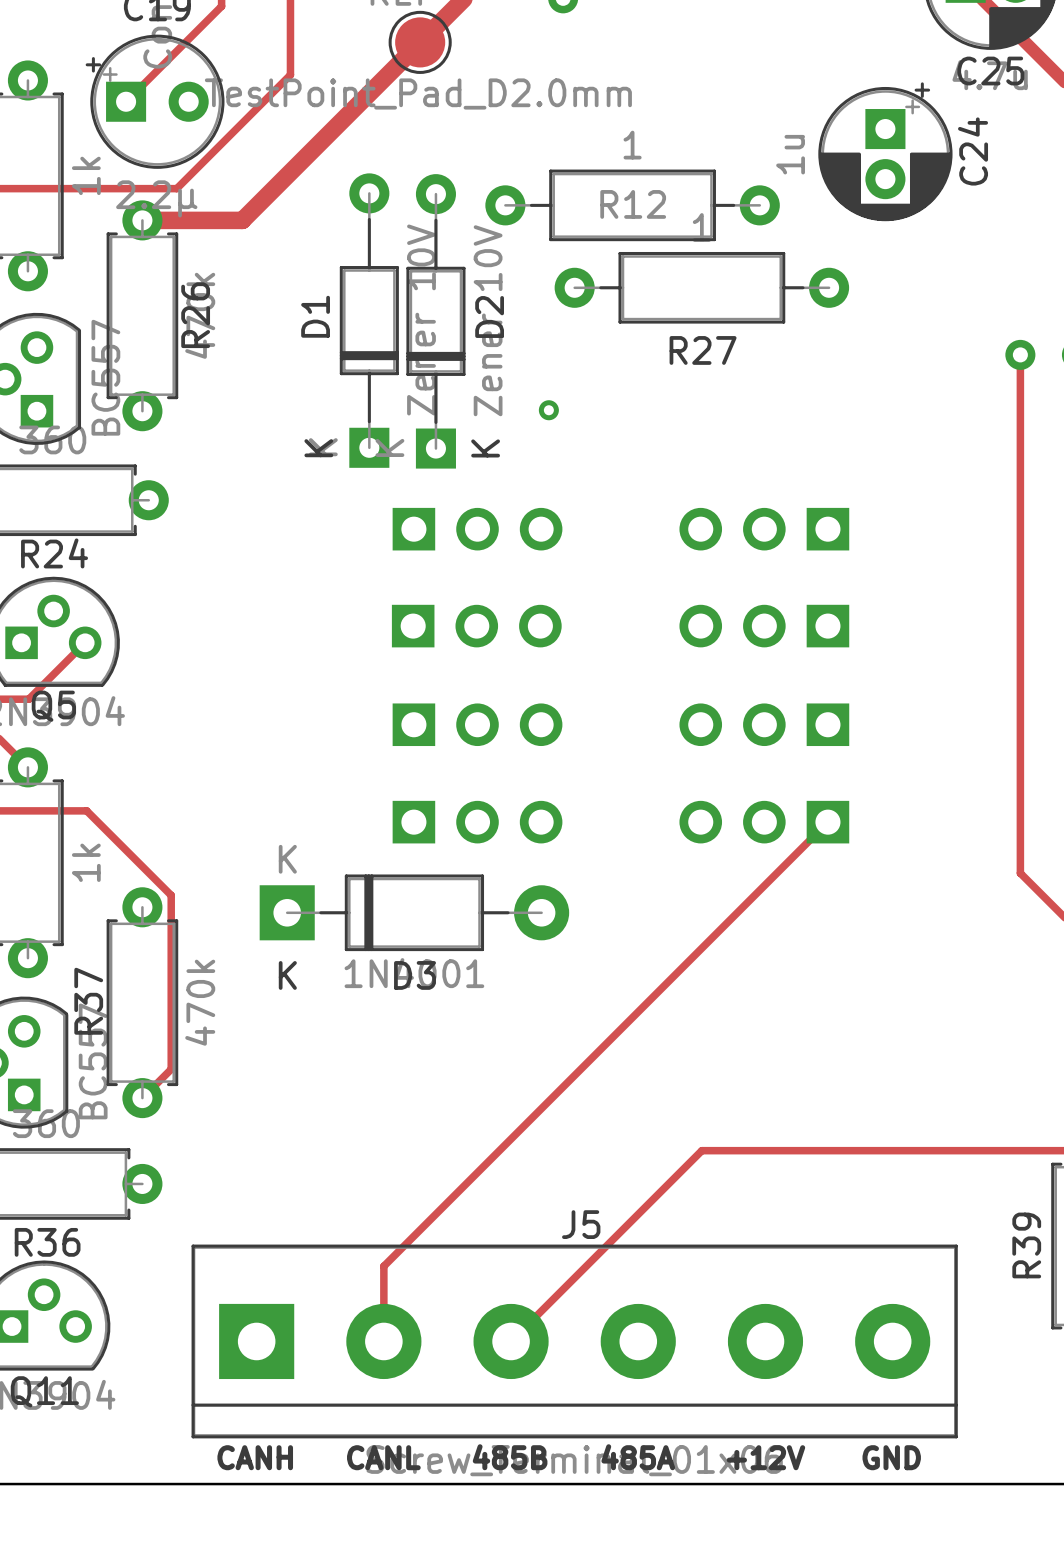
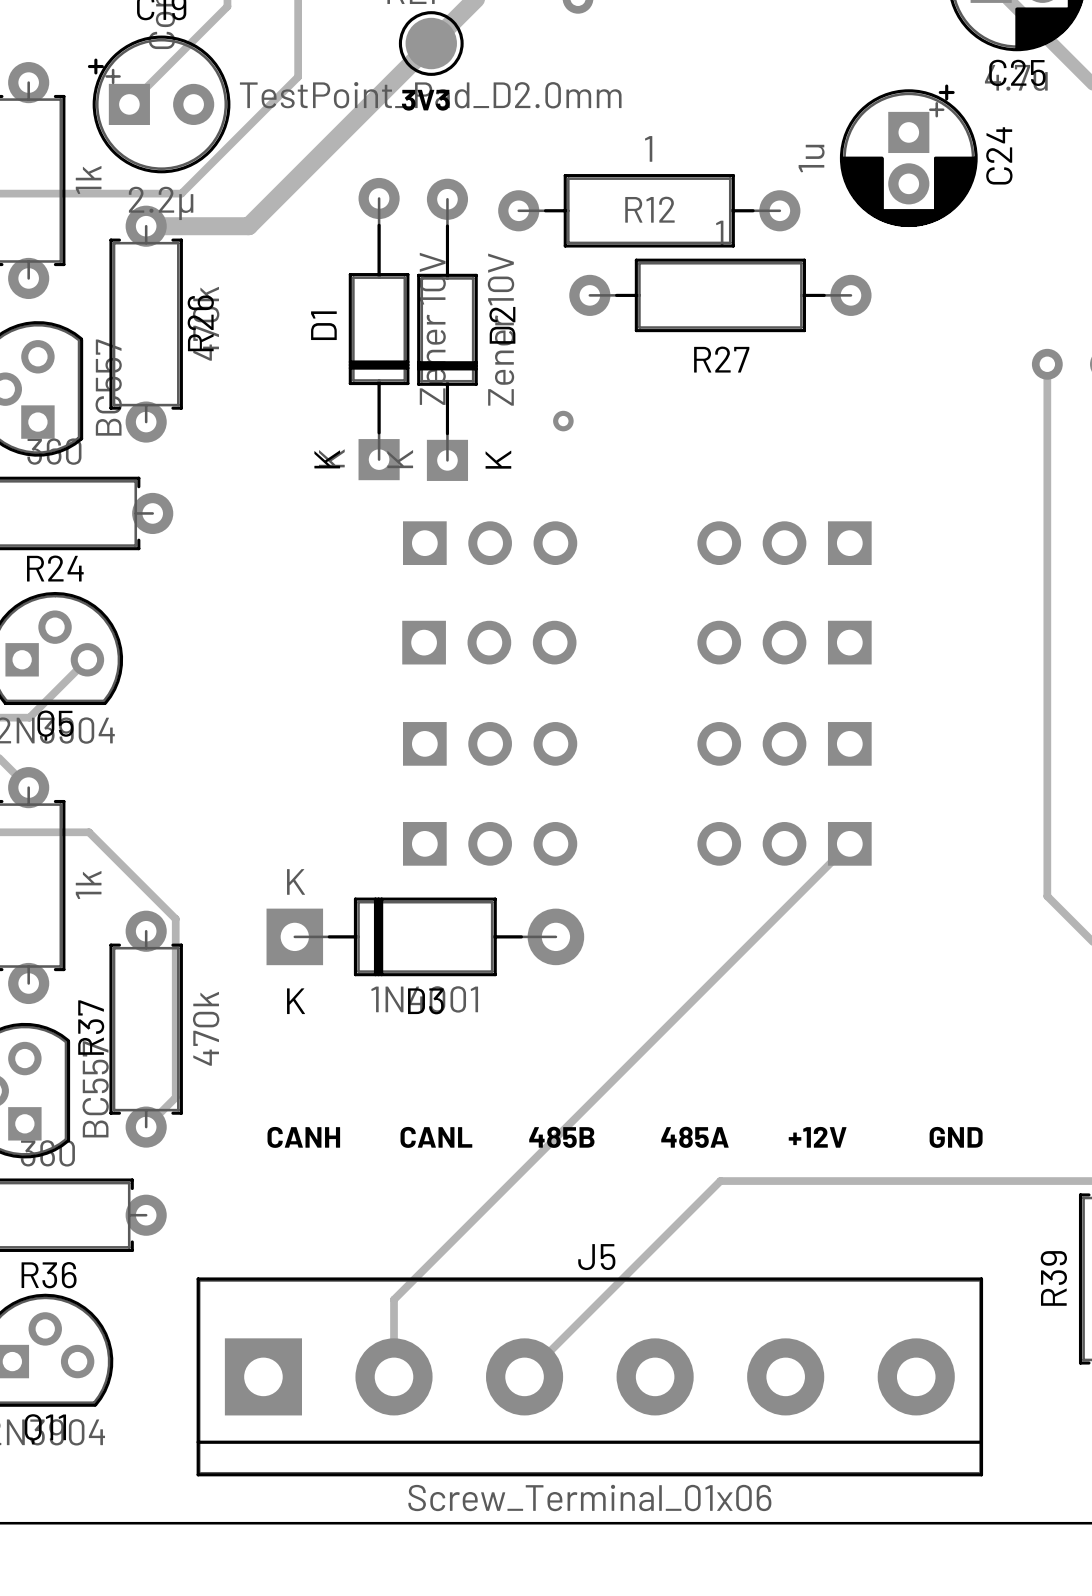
text: none -> 3V3 (425, 100)
text position: CANH (255, 1457) -> CANH (303, 1137)
text position: CANL (383, 1457) -> CANL (436, 1137)
text position: 485B (510, 1457) -> 485B (561, 1137)
text position: 485A (638, 1457) -> 485A (694, 1137)
text position: +12V (765, 1457) -> +12V (817, 1137)
text position: GND (891, 1457) -> GND (956, 1137)

